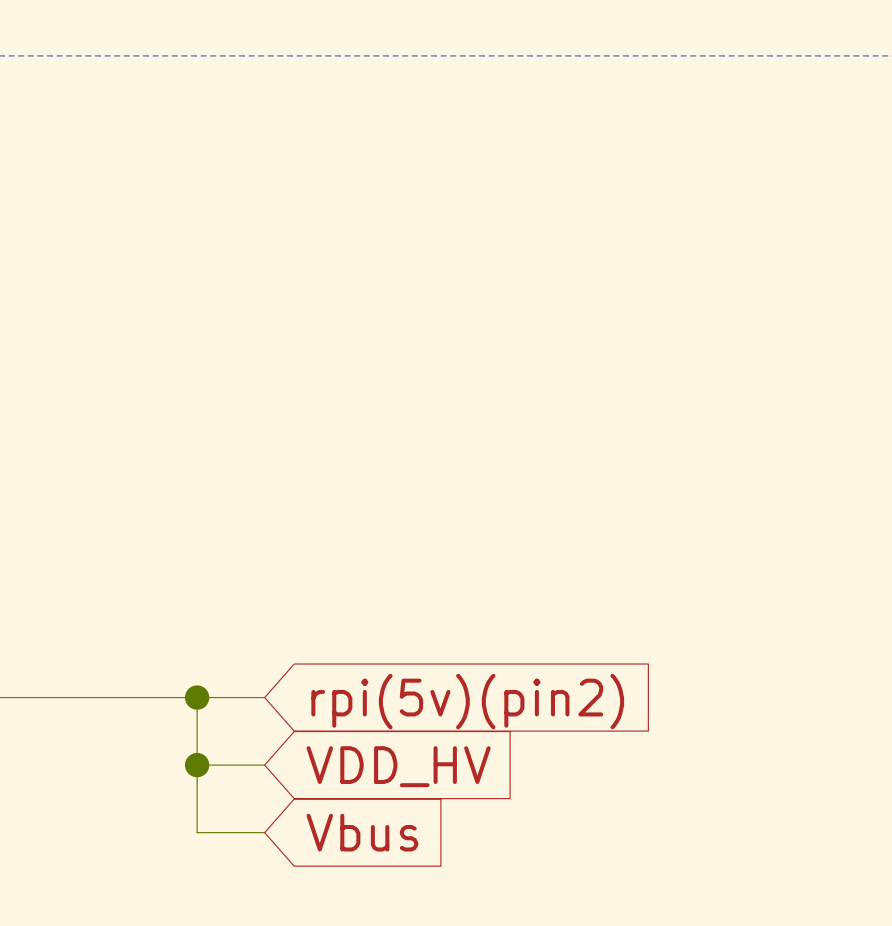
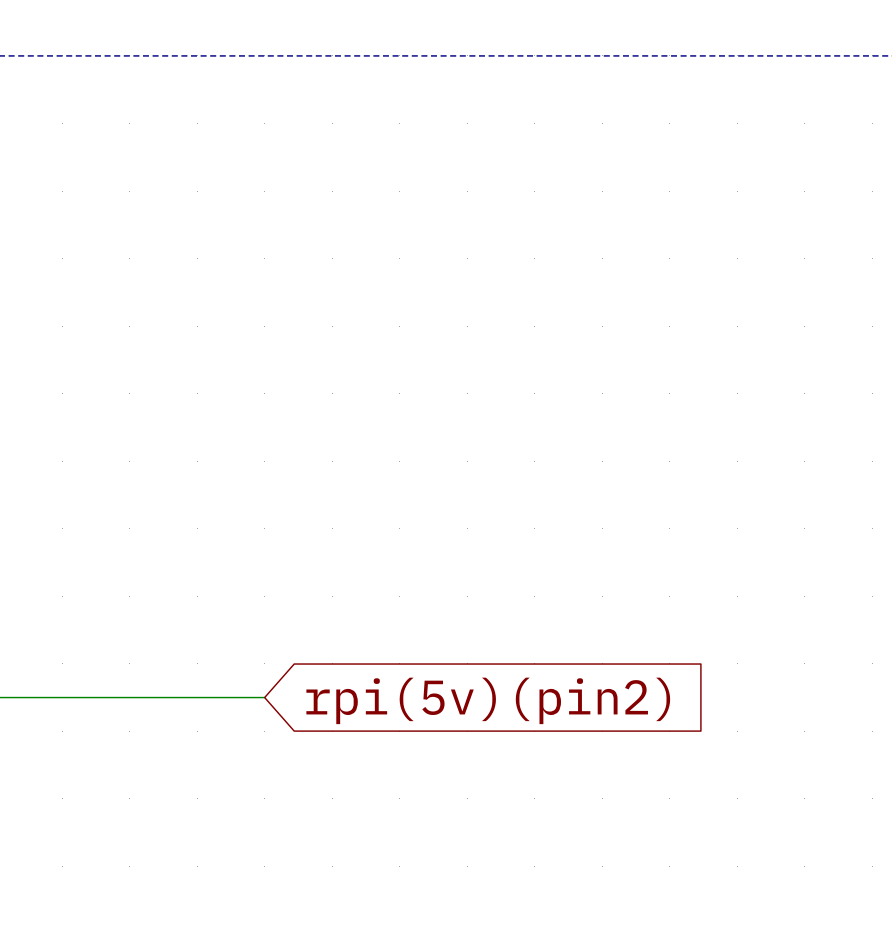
wire: (197, 697) (197, 832) (264, 832) -> none
junction: (197, 697) -> none
wire: (197, 765) (264, 765) -> none
junction: (197, 765) -> none
global label: VDD_HV (398, 766) -> none
global label: Vbus (362, 832) -> none

